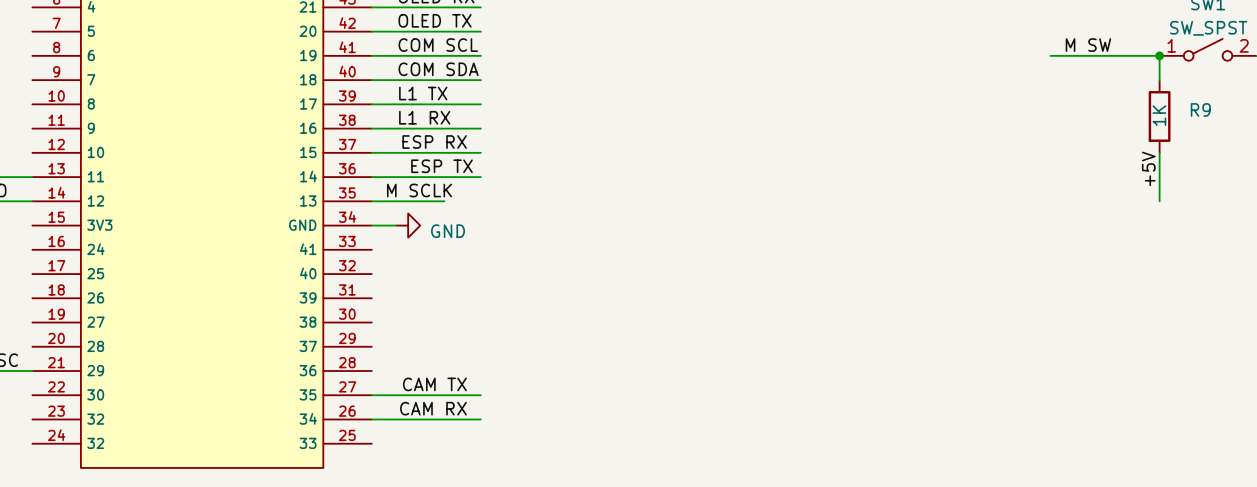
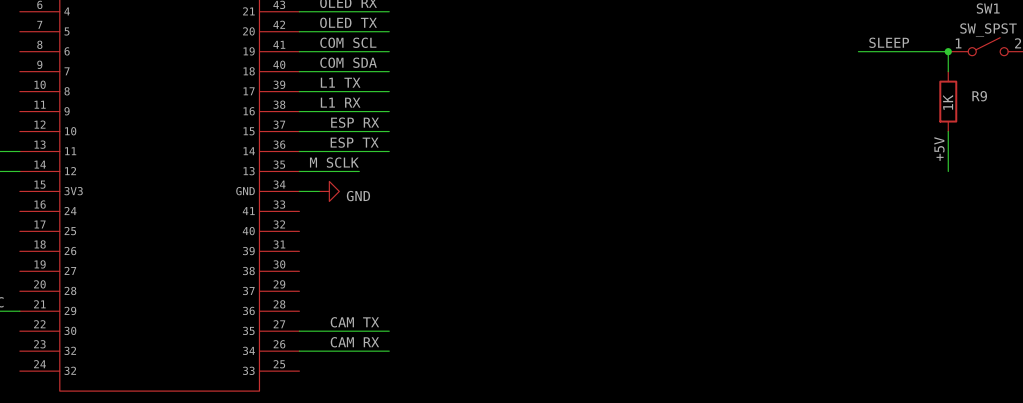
label: M SW (1088, 45) -> SLEEP (889, 42)

